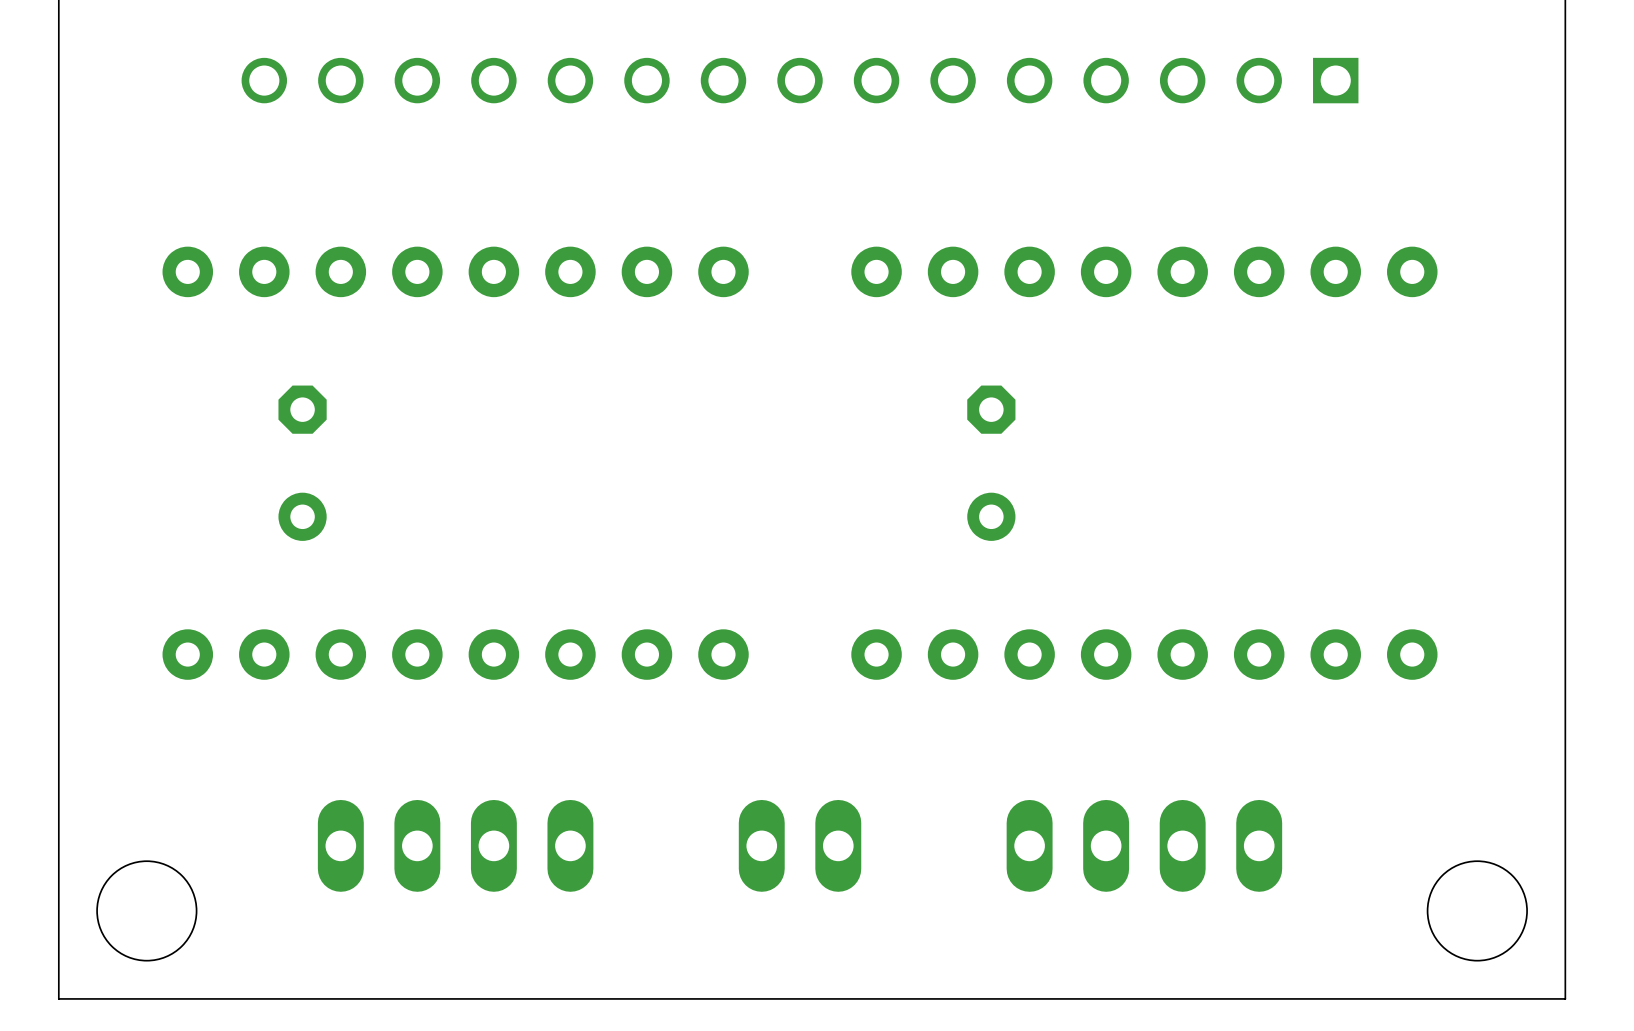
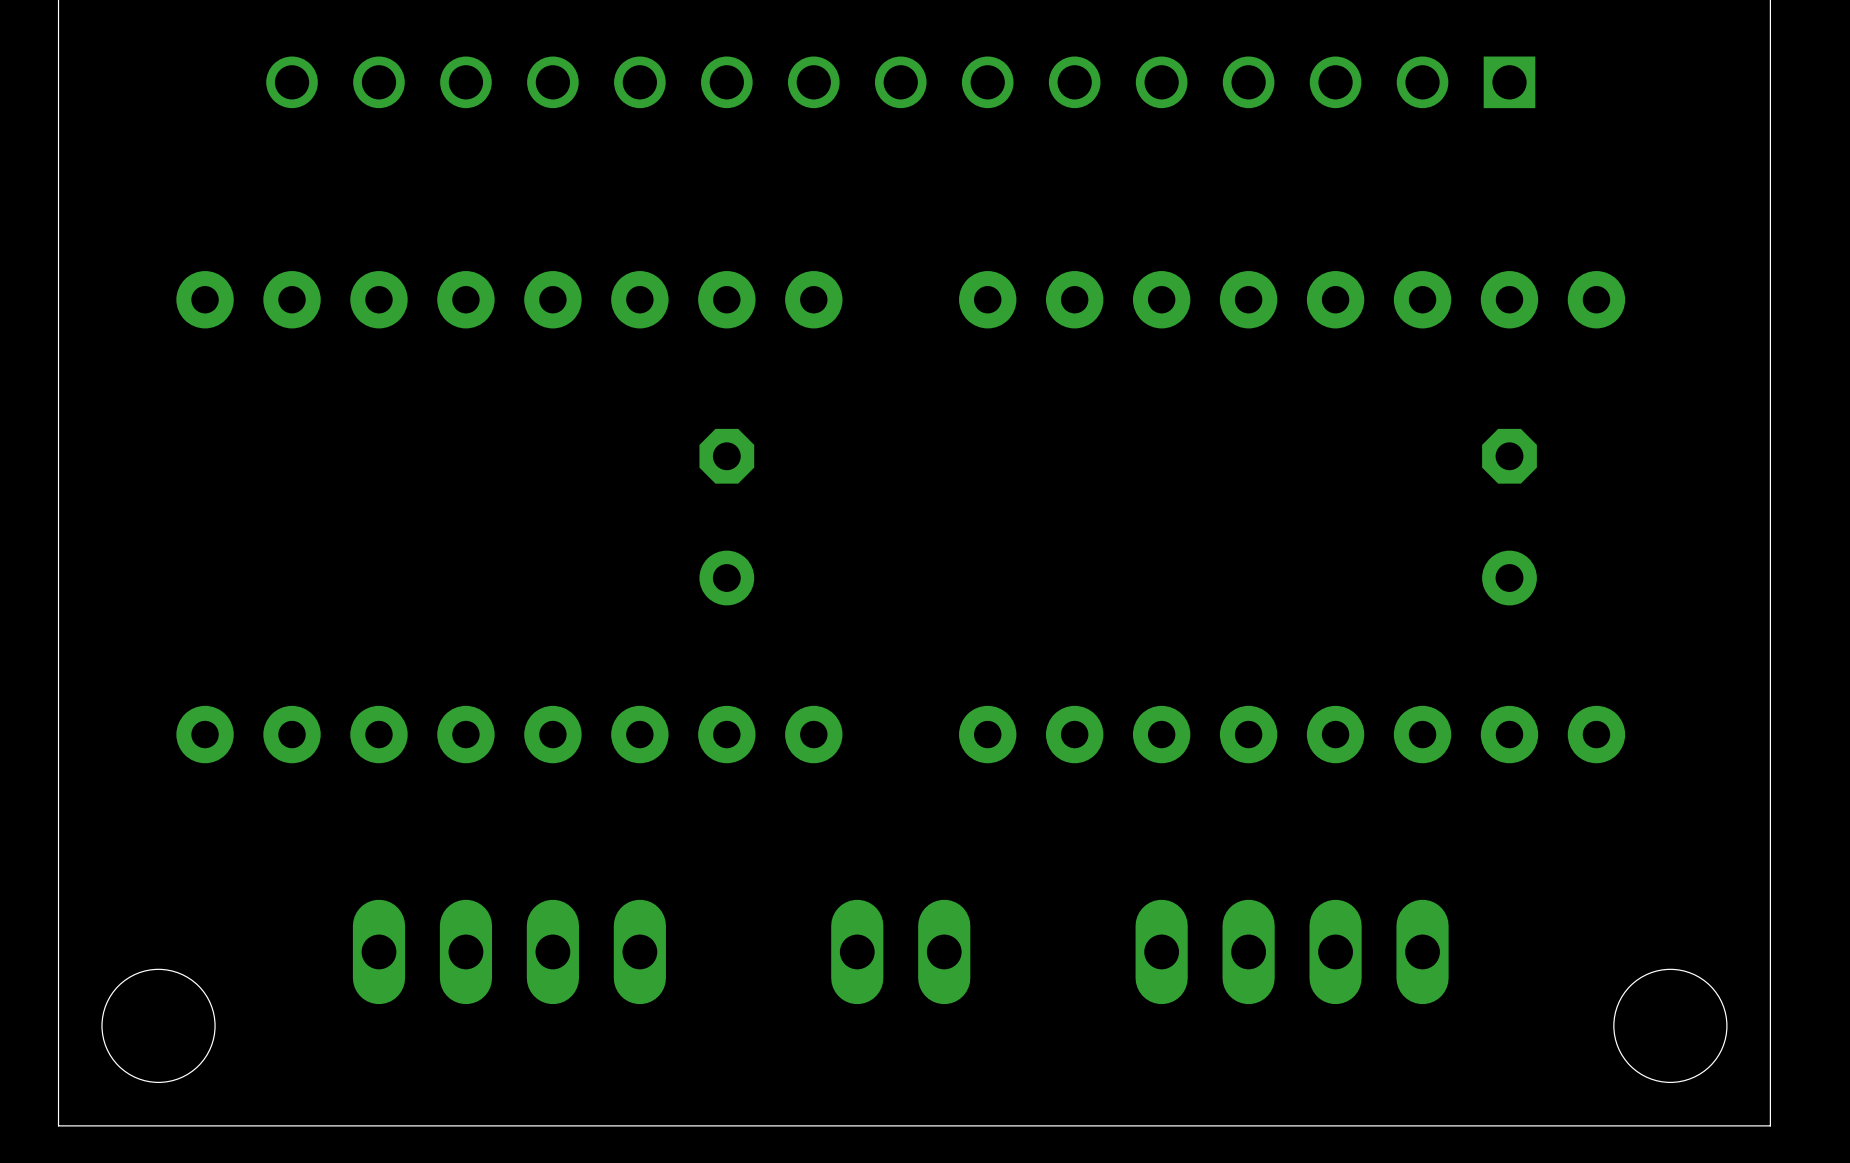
part: (302, 463) -> none
part: none -> (726, 517)
part: (991, 463) -> none
part: none -> (1509, 517)

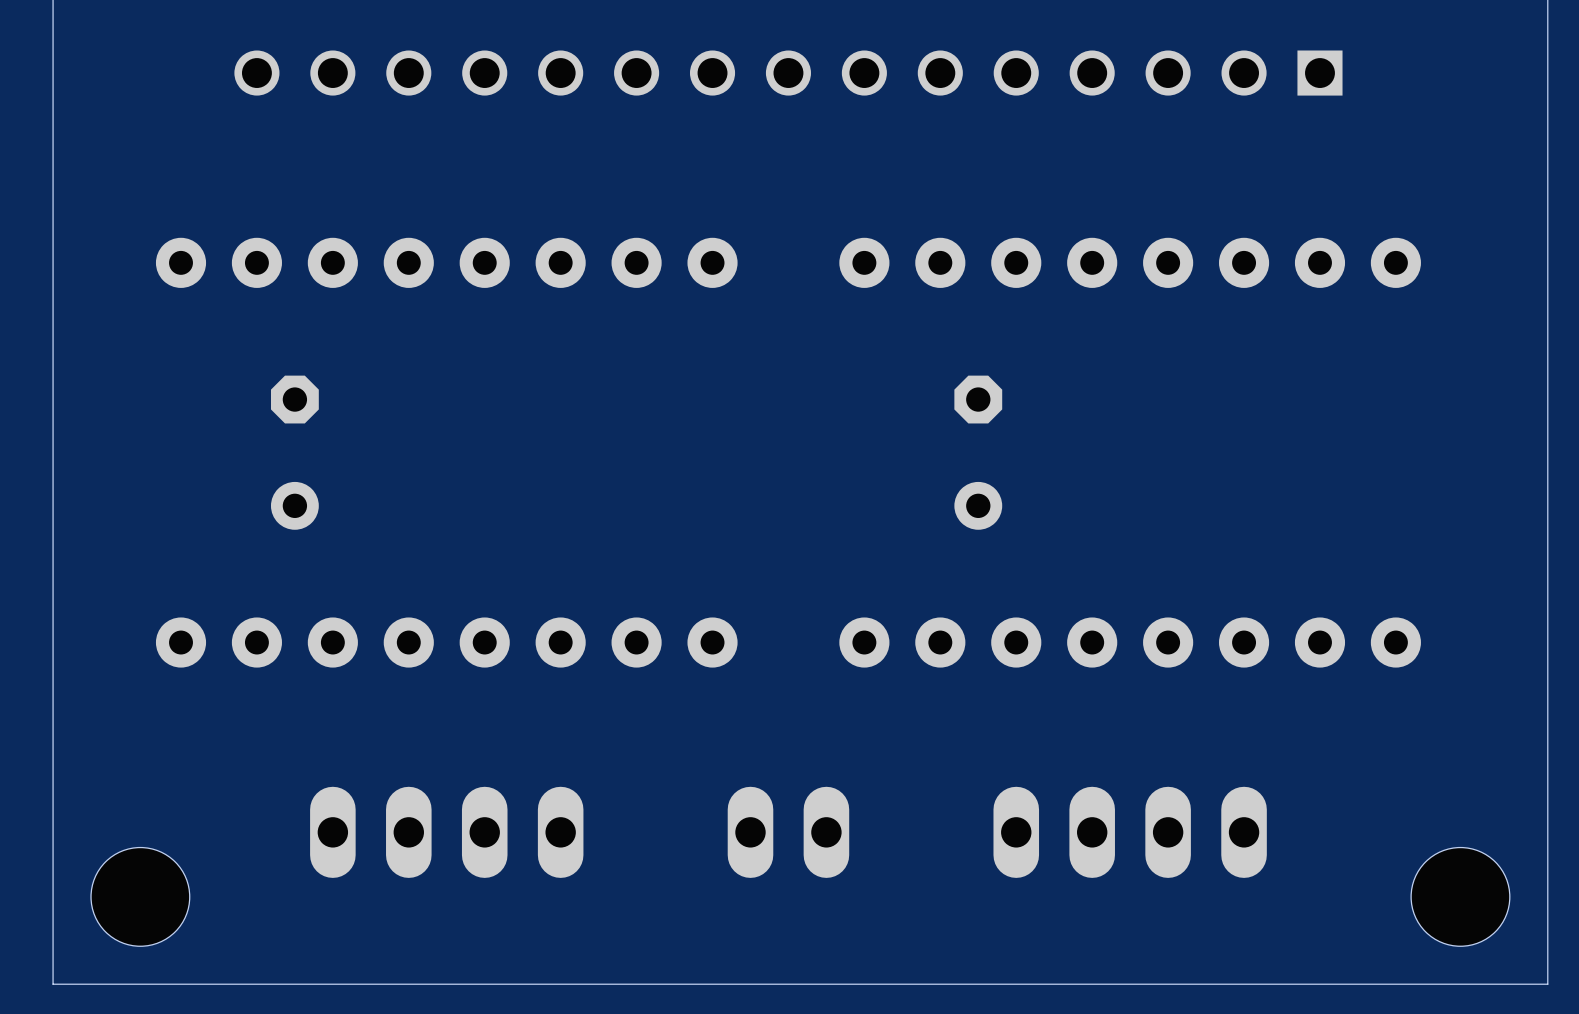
part: none -> (294, 452)
part: (726, 517) -> none
part: none -> (978, 452)
part: (1509, 517) -> none

